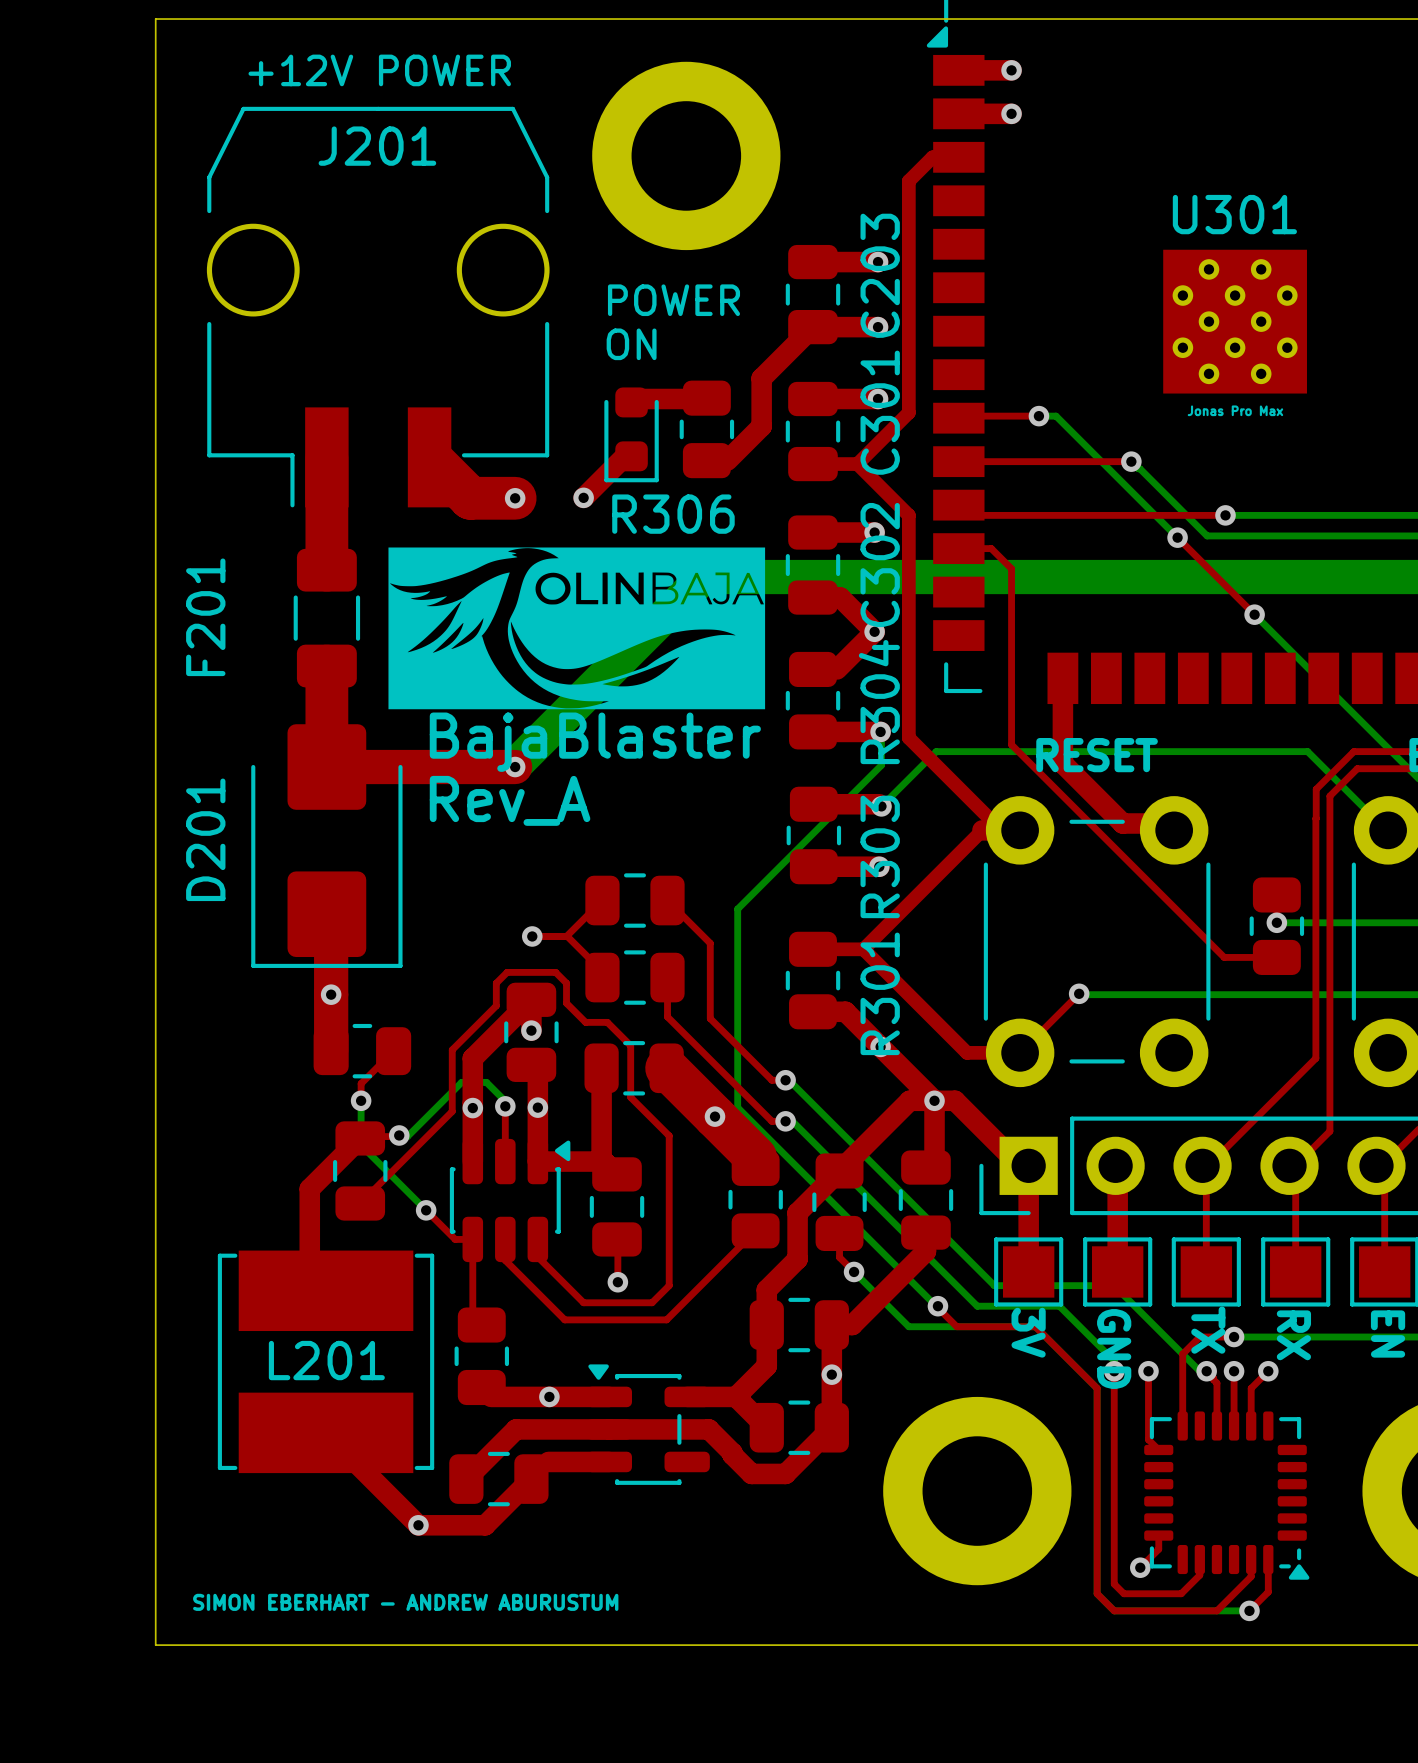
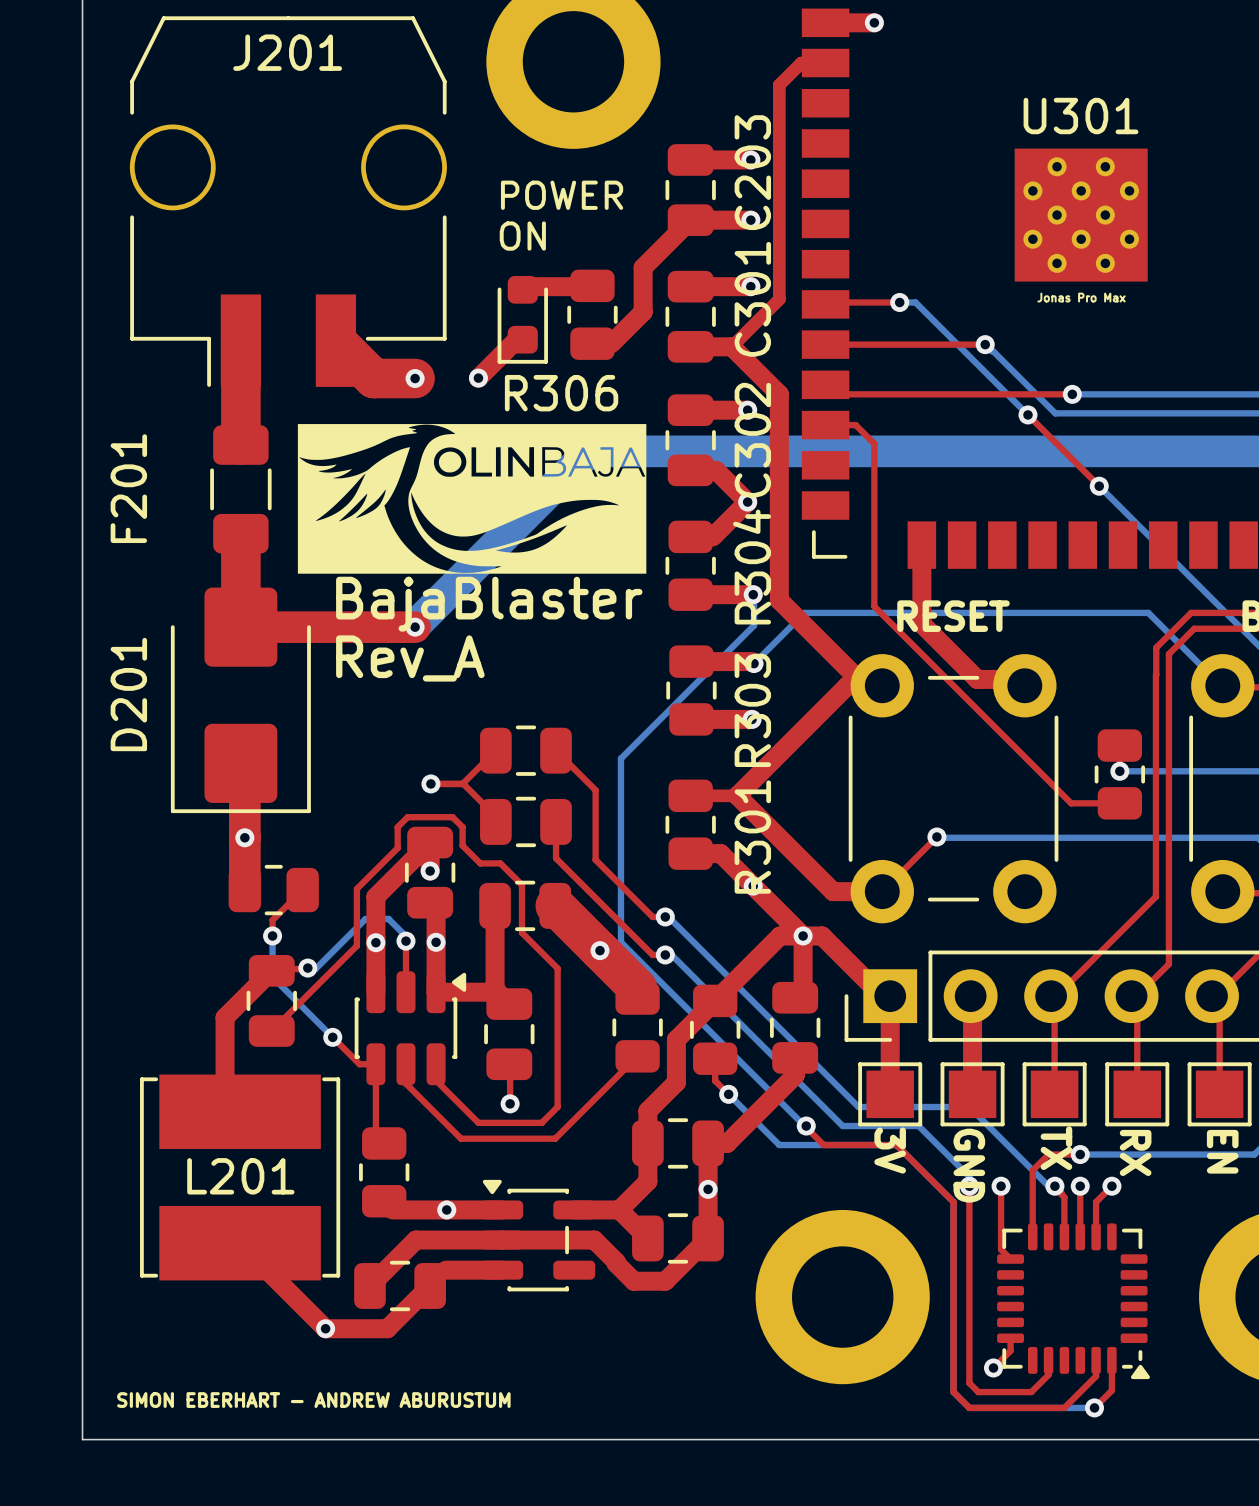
top track width: thin (812, 464) (857, 464) (908, 515) (908, 737) (1001, 830) -> thick (690, 346) (731, 346) (779, 394) (779, 600) (864, 685)
top track width: thin (982, 830) (863, 949) (967, 1052) (1013, 1052) -> thick (847, 685) (737, 795) (833, 891) (875, 891)

